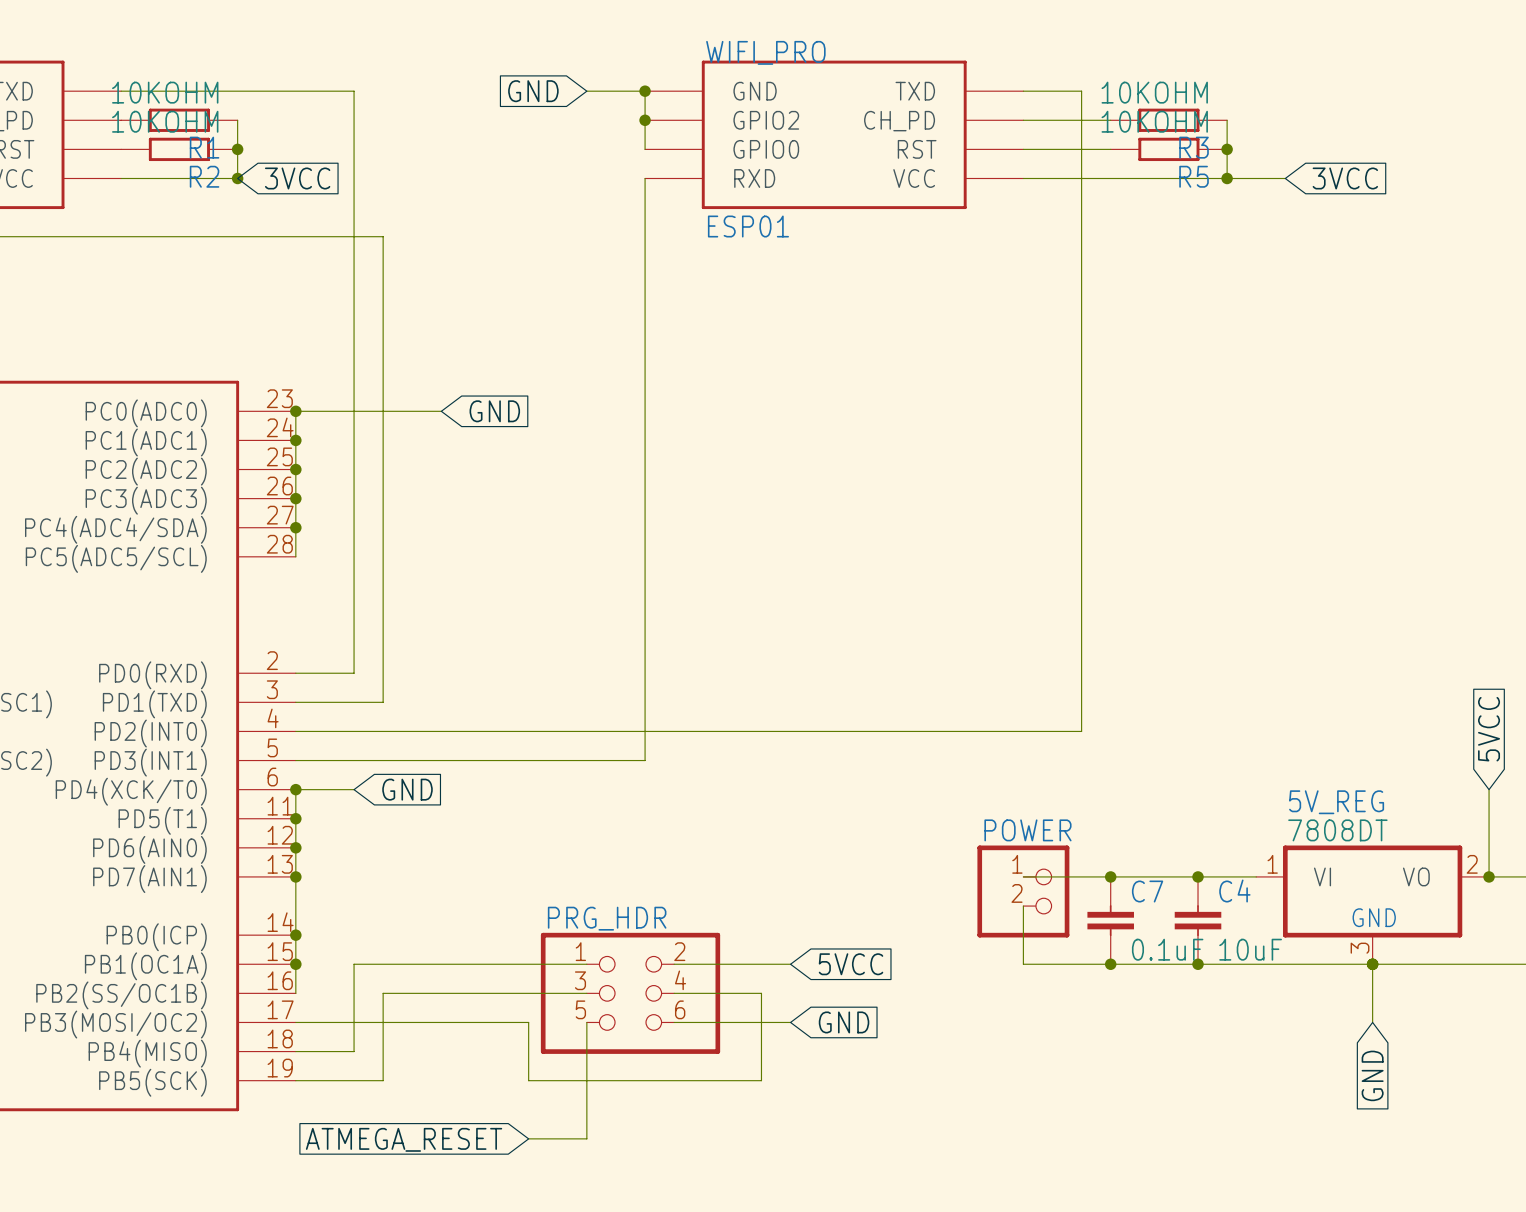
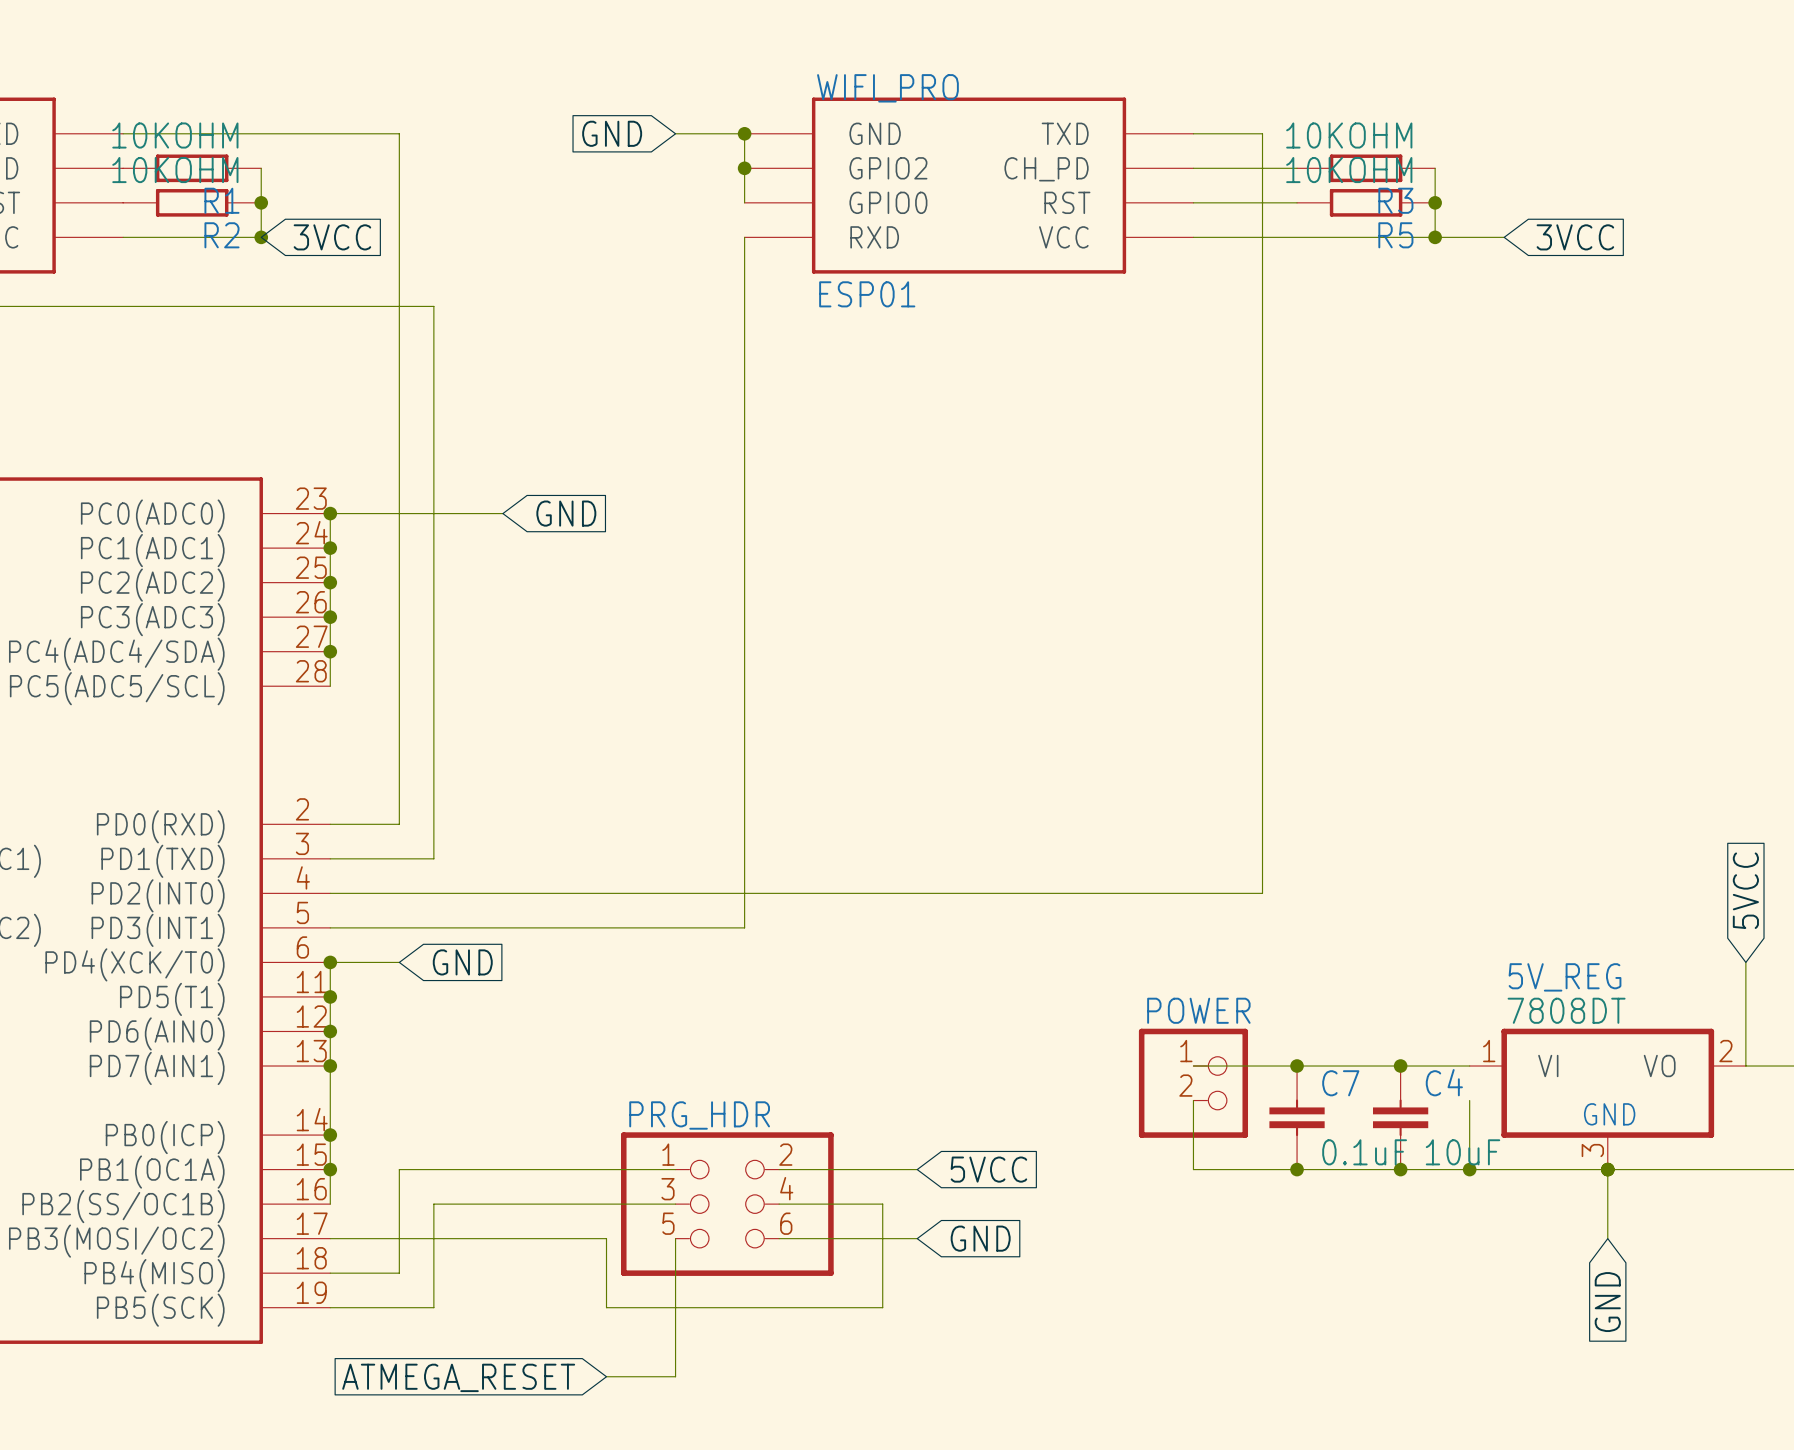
junction: (1489, 876) -> none
wire: none -> (1469, 1100) (1469, 1169)
junction: none -> (1469, 1169)

